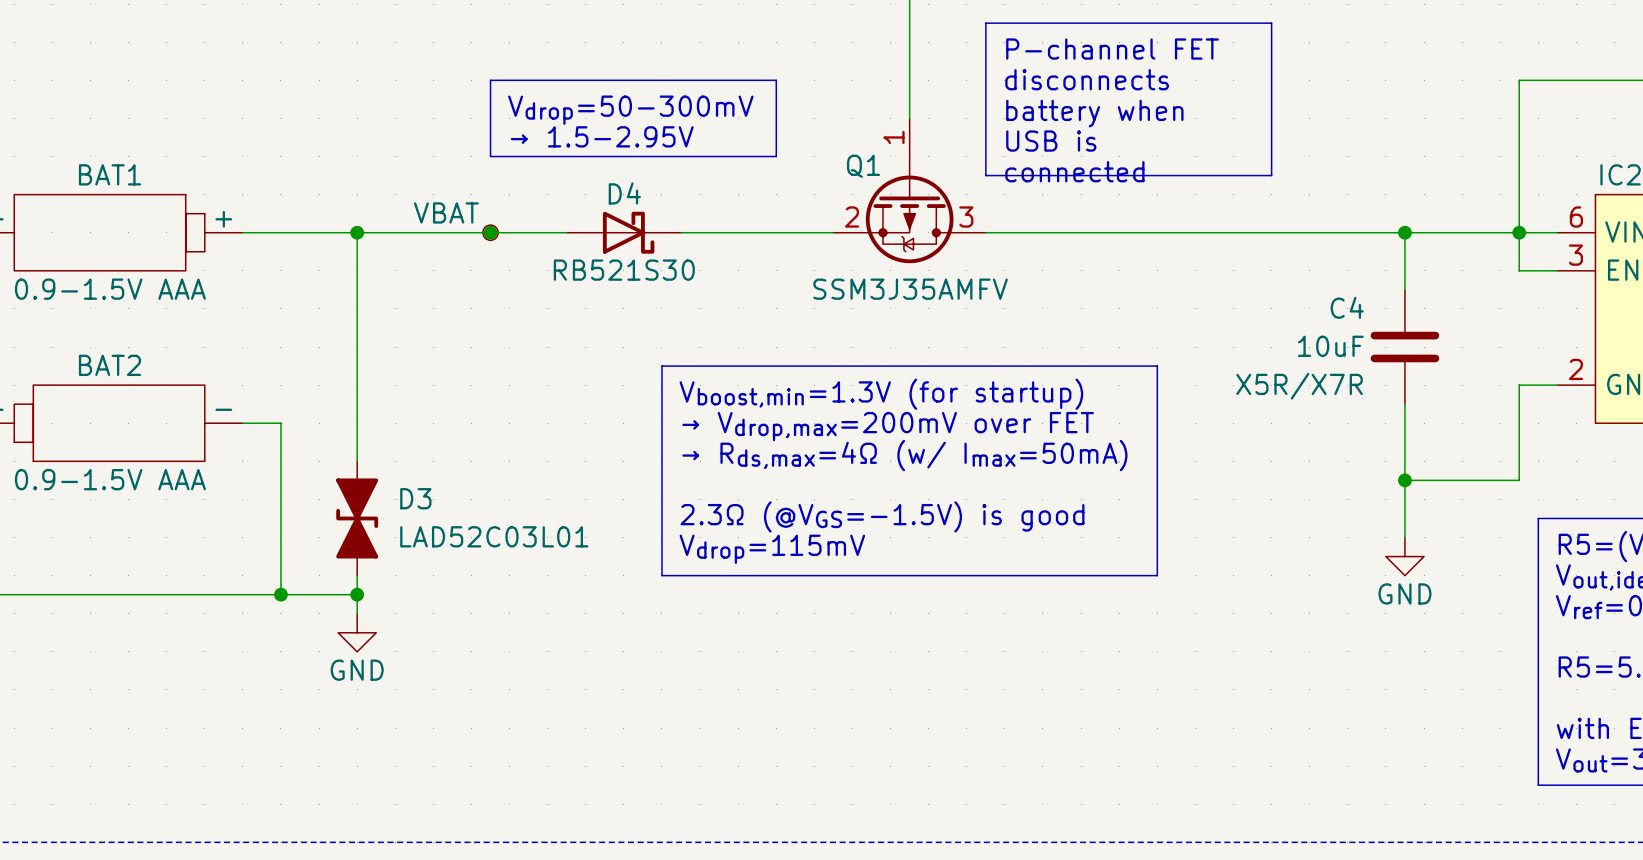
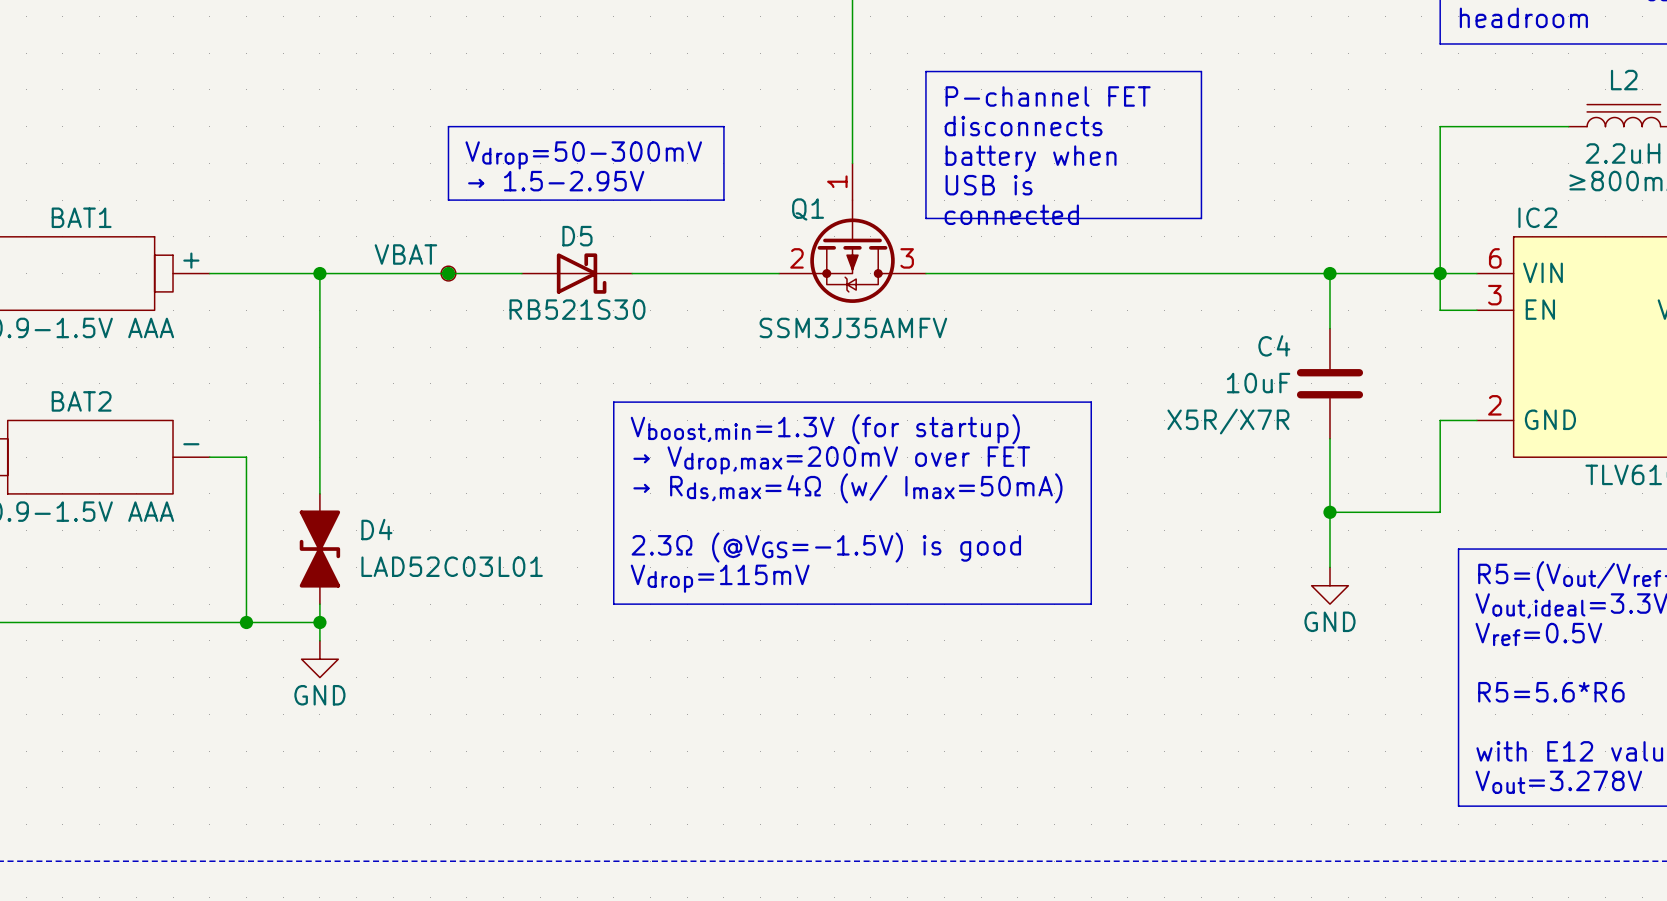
D4 name: D4 (624, 193) -> D5 (577, 236)
D3 name: D3 (415, 498) -> D4 (376, 529)

